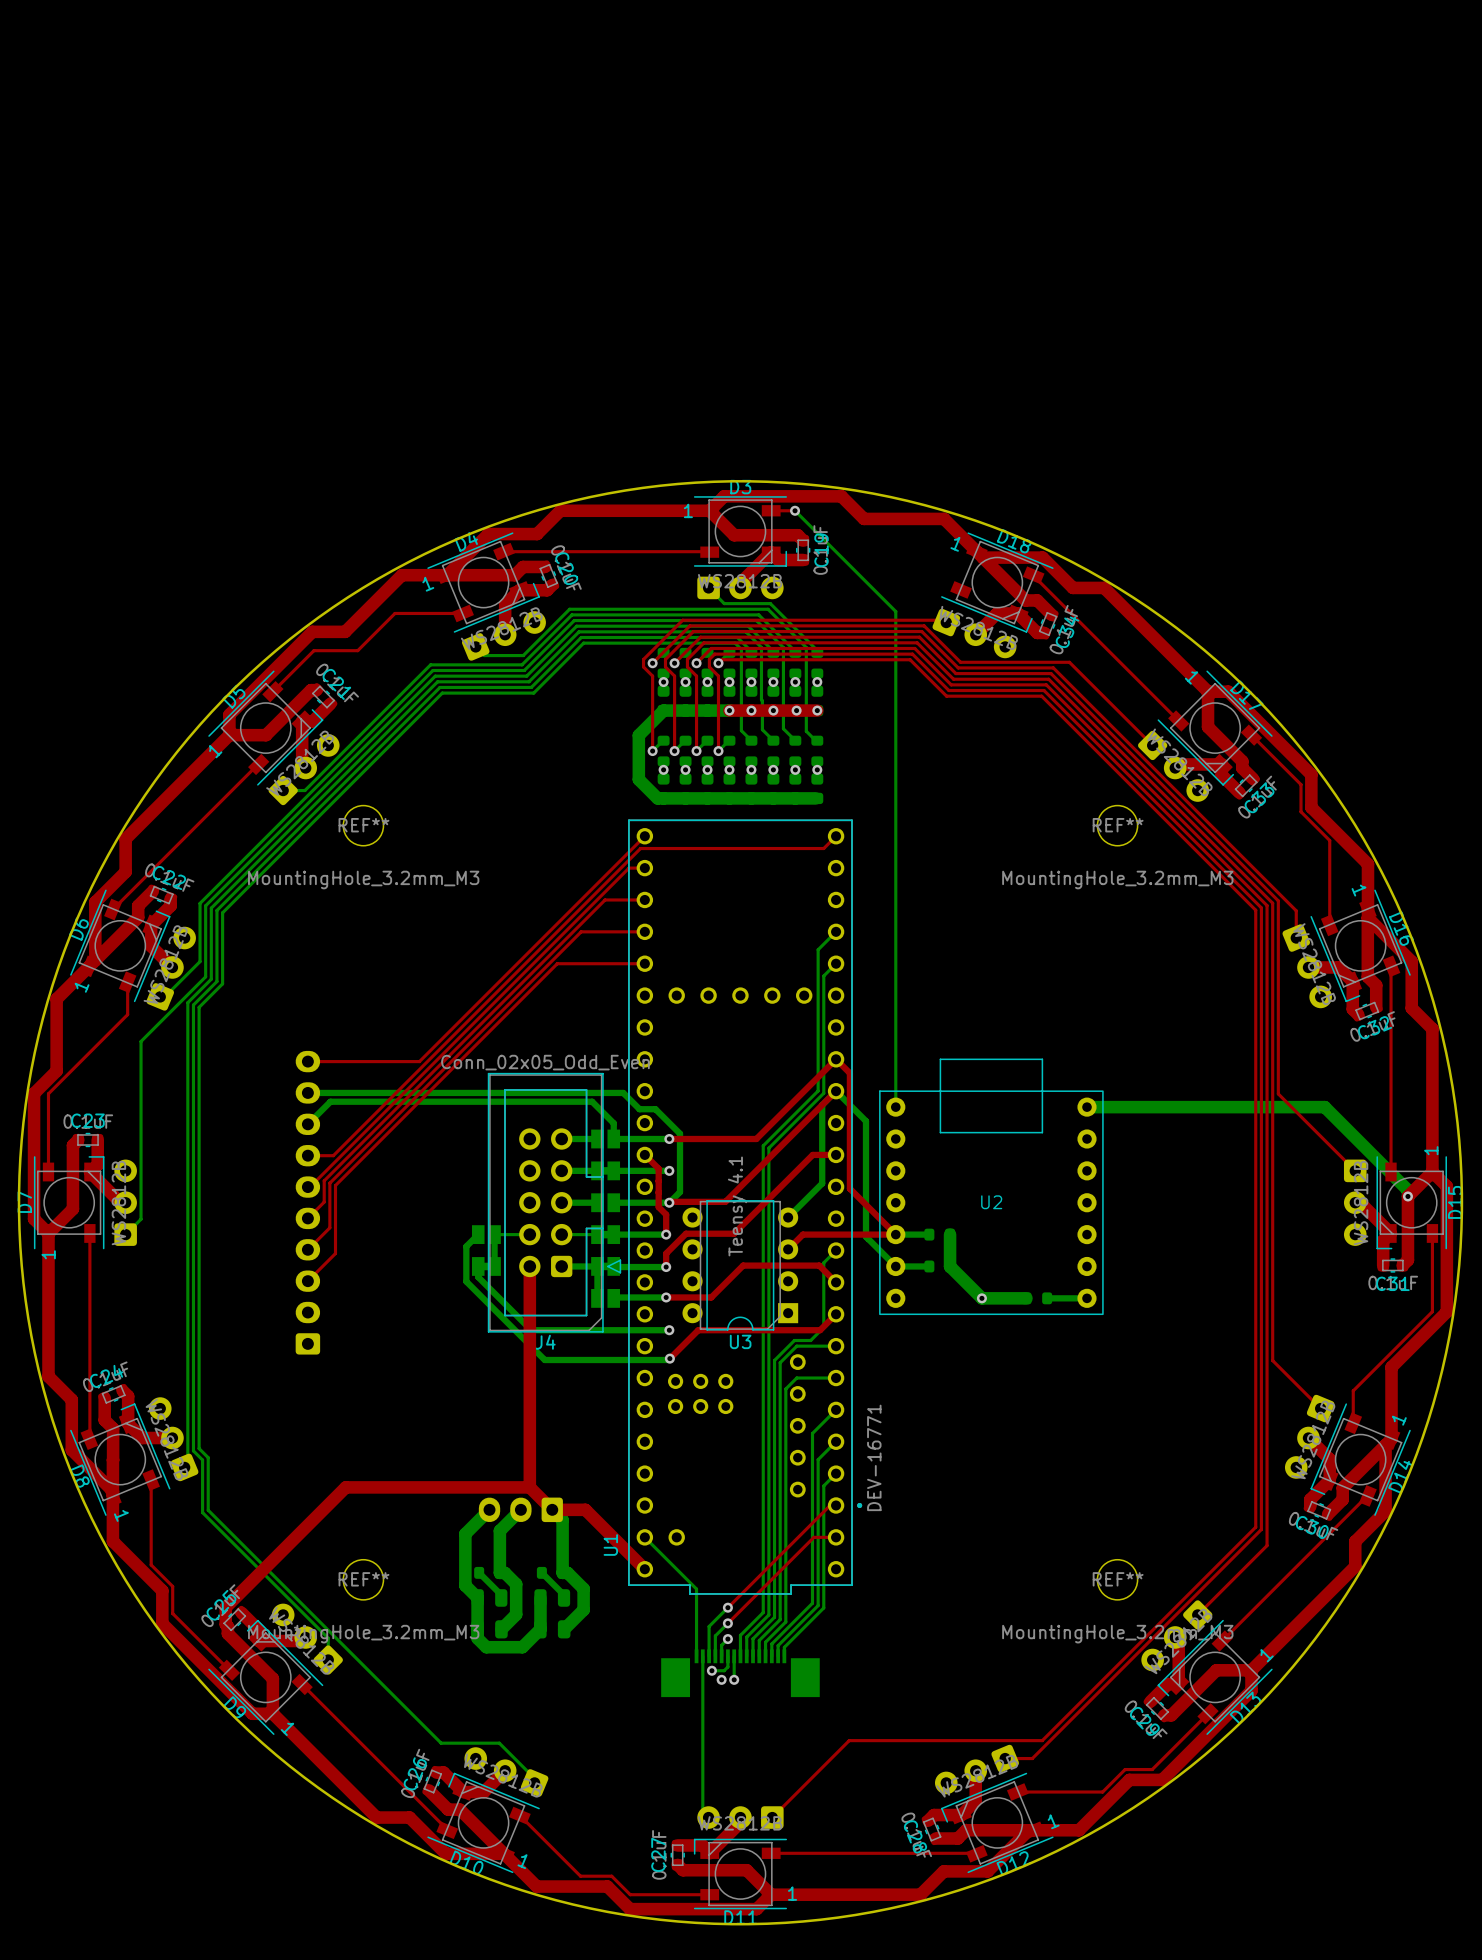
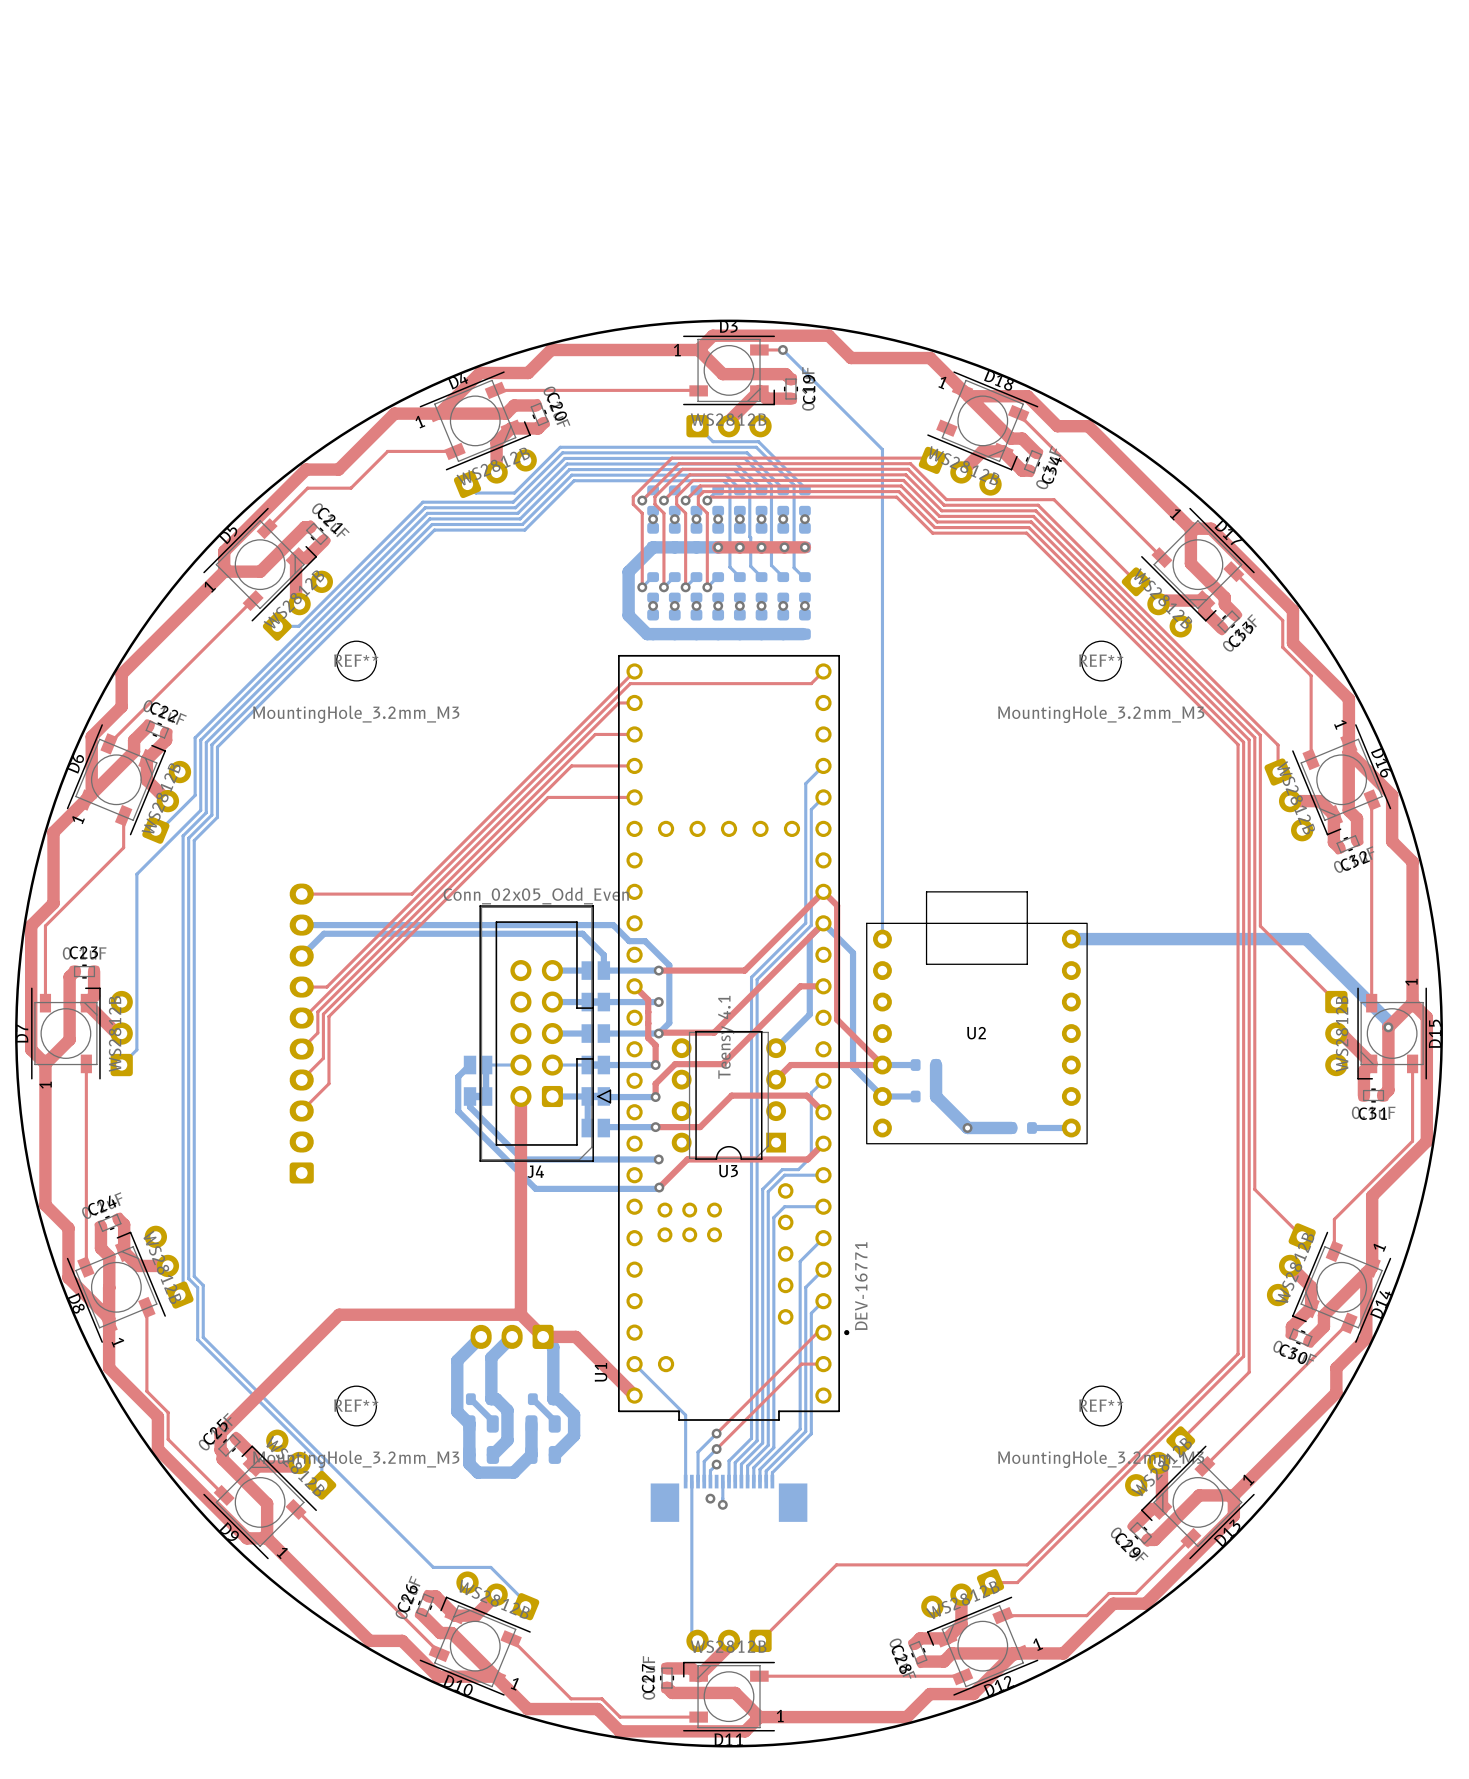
bottom track: (727, 1656) (727, 1666) (724, 1670) (711, 1670) -> none
via: (711, 1670) -> none
via: none -> (710, 1498)
via: (721, 1679) -> none

